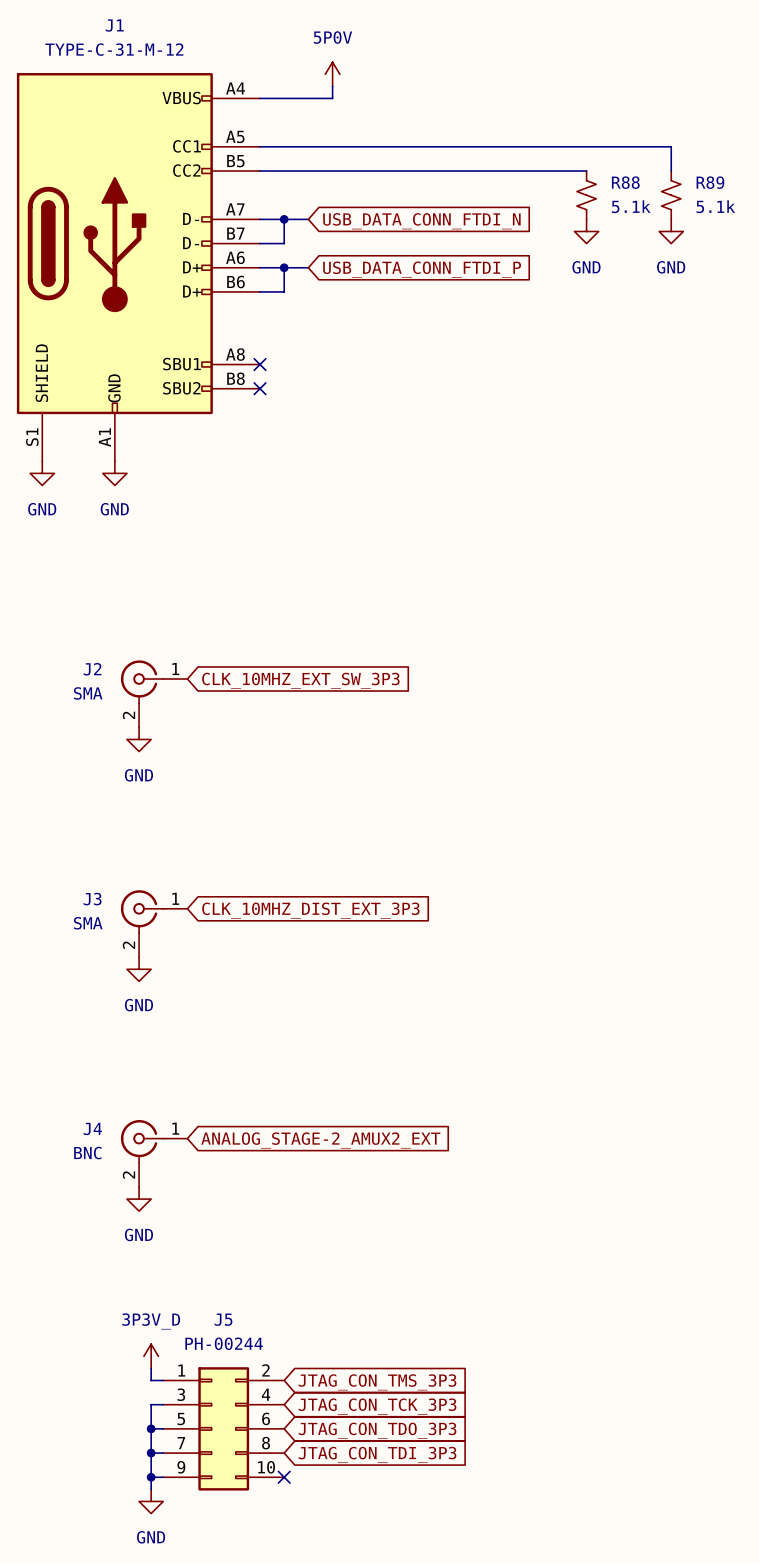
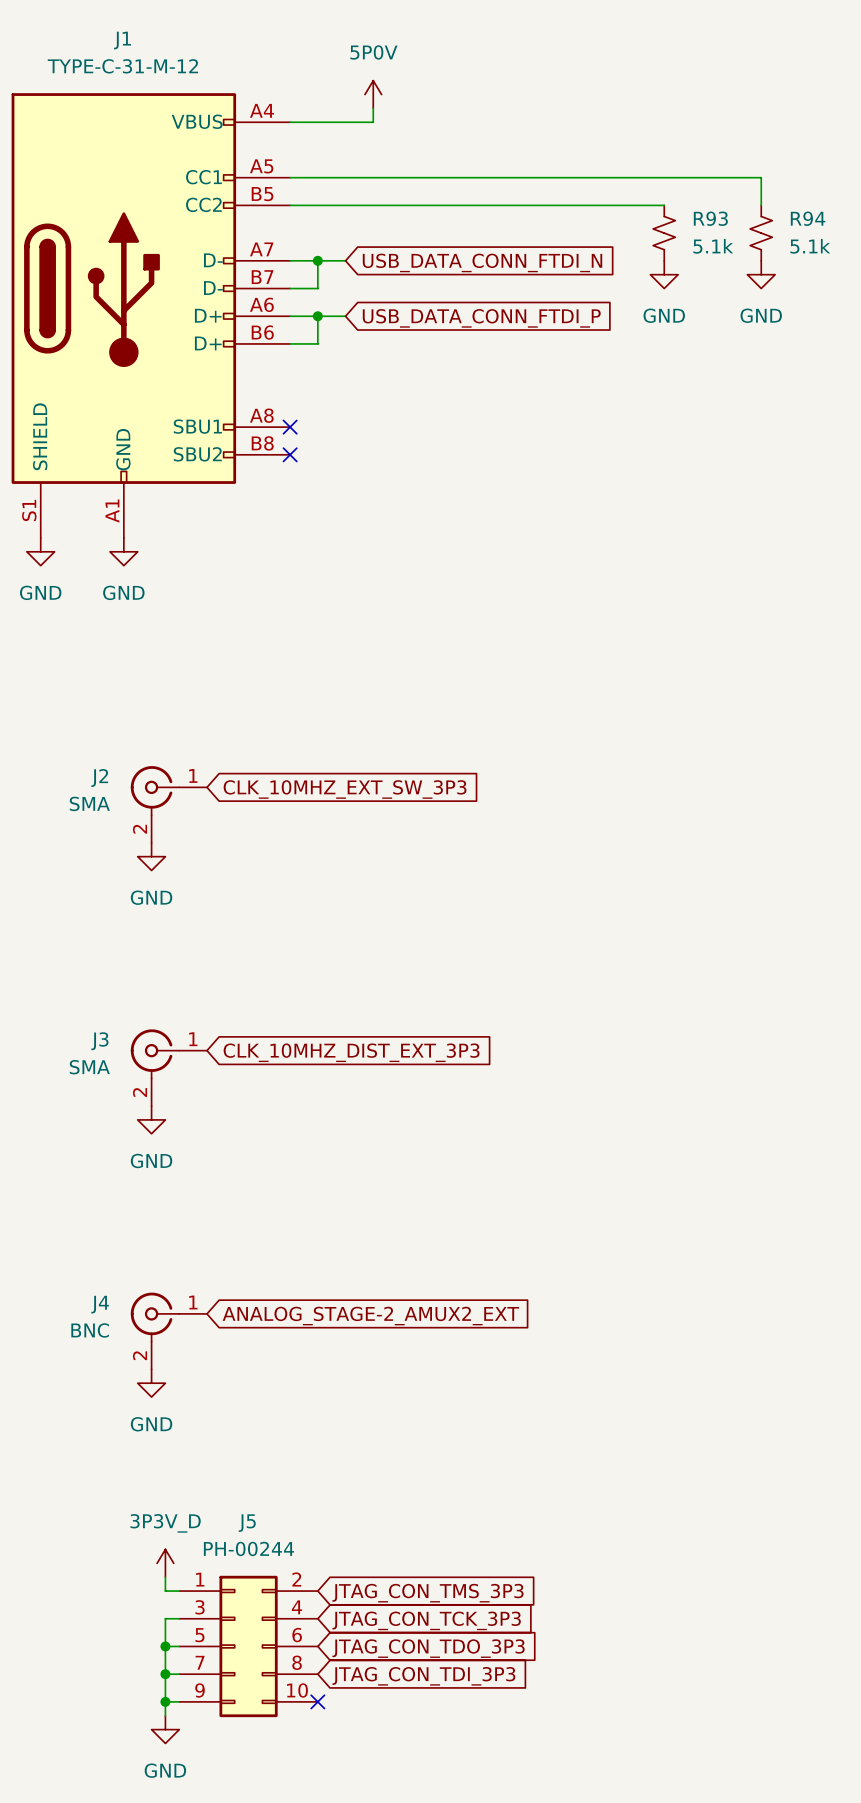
R88 name: R88 (625, 182) -> R93 (710, 218)
R89 name: R89 (710, 182) -> R94 (808, 218)

